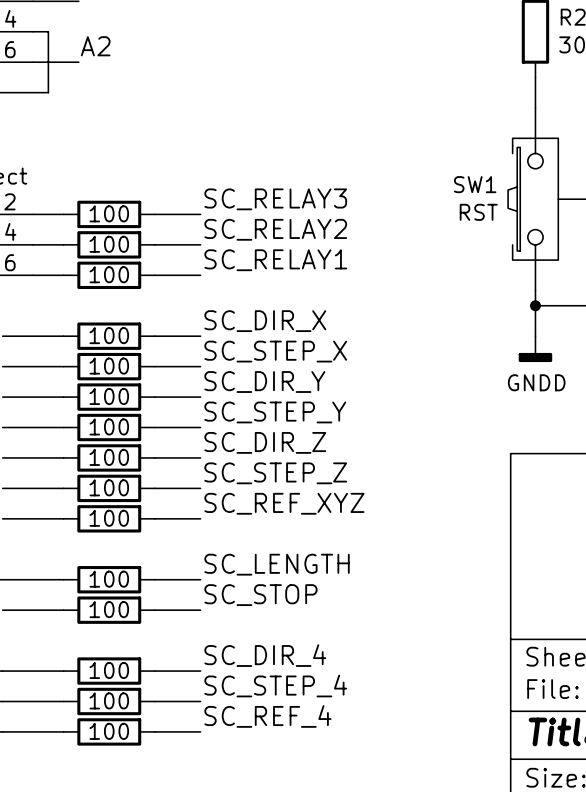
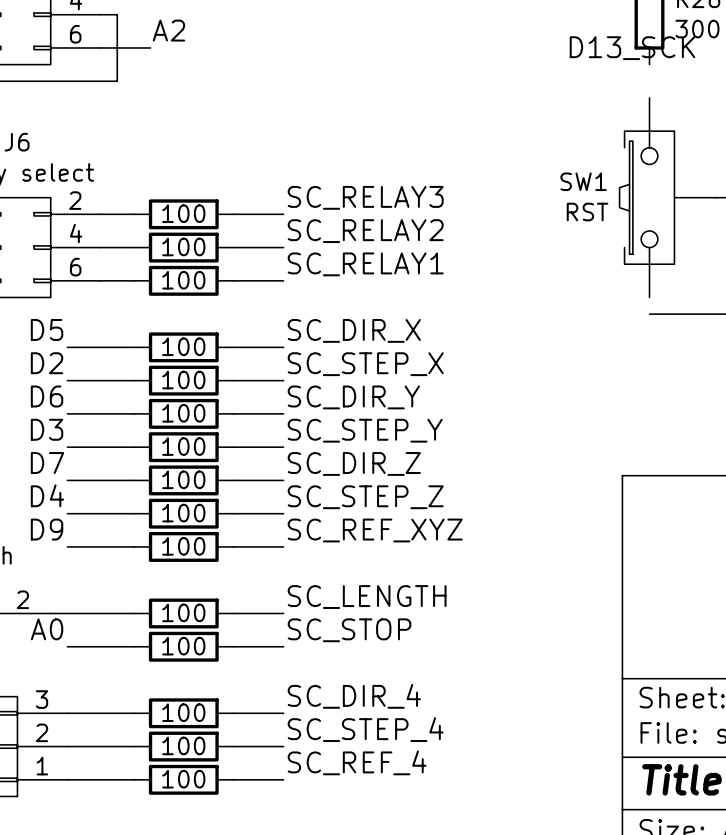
label: none -> D13_SCK (632, 48)
wire: (535, 77) (535, 107) -> none
wire: (535, 290) (535, 336) -> none
junction: (535, 305) -> none
power symbol: GNDD (535, 349) -> none

